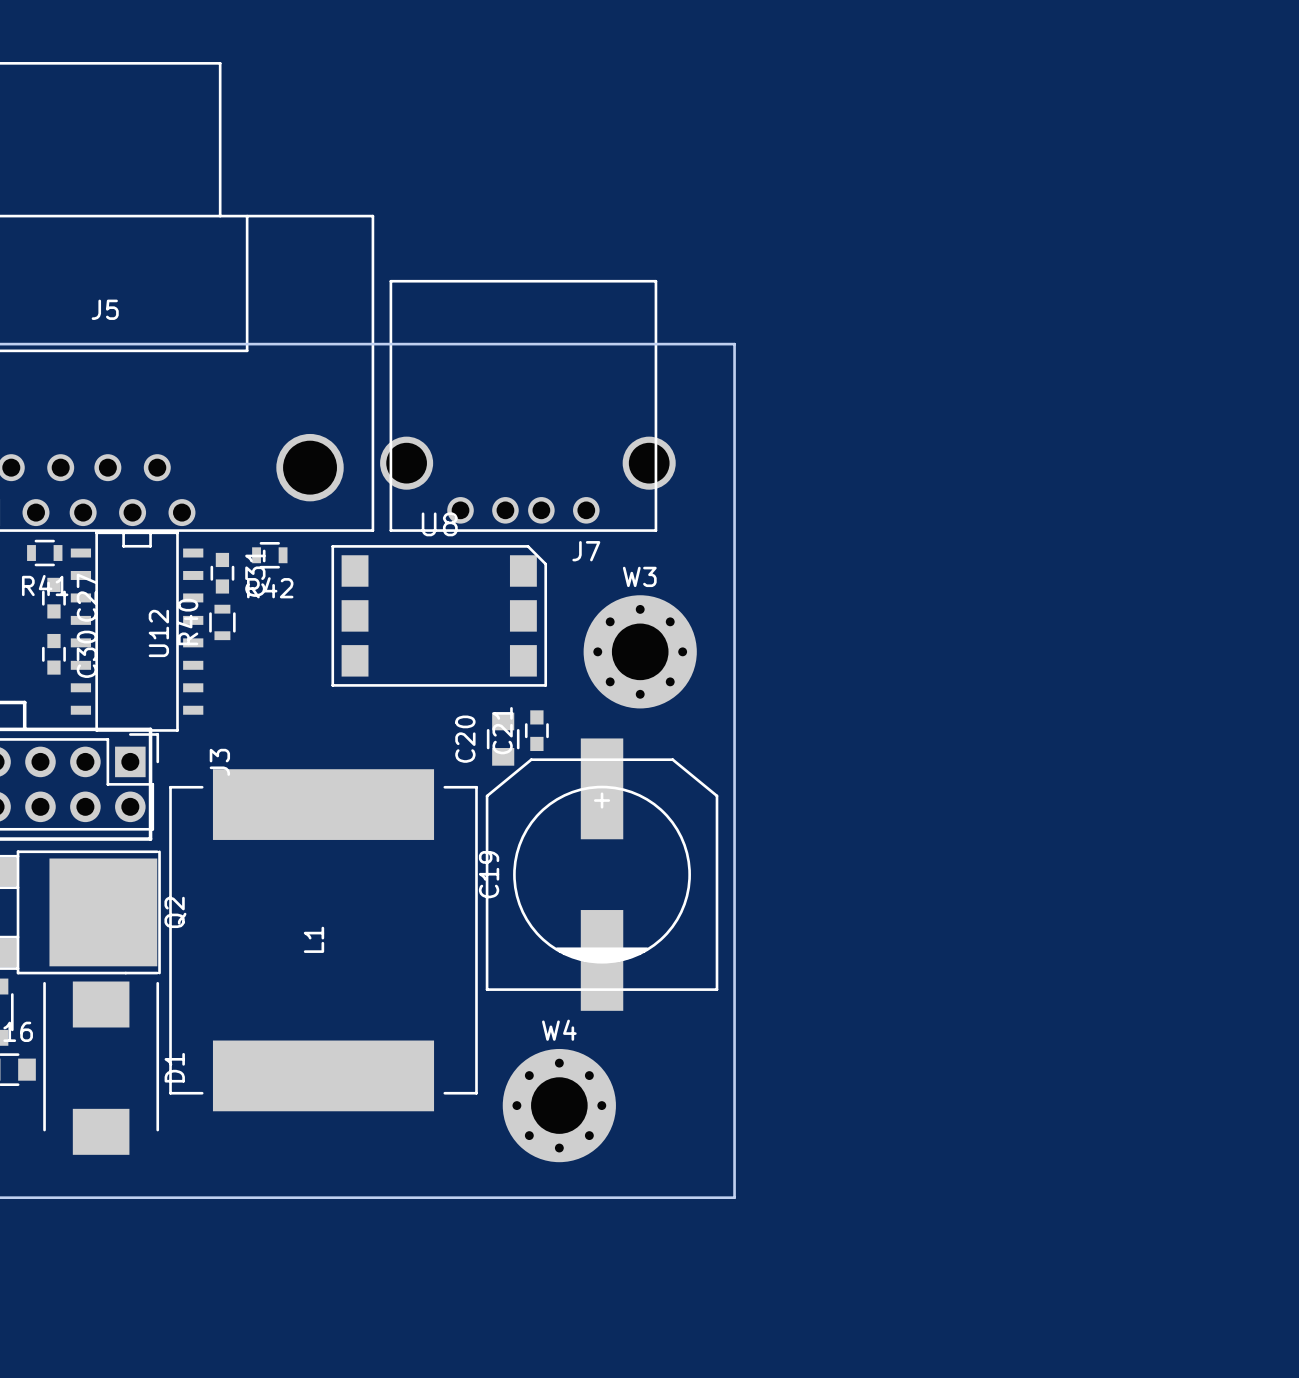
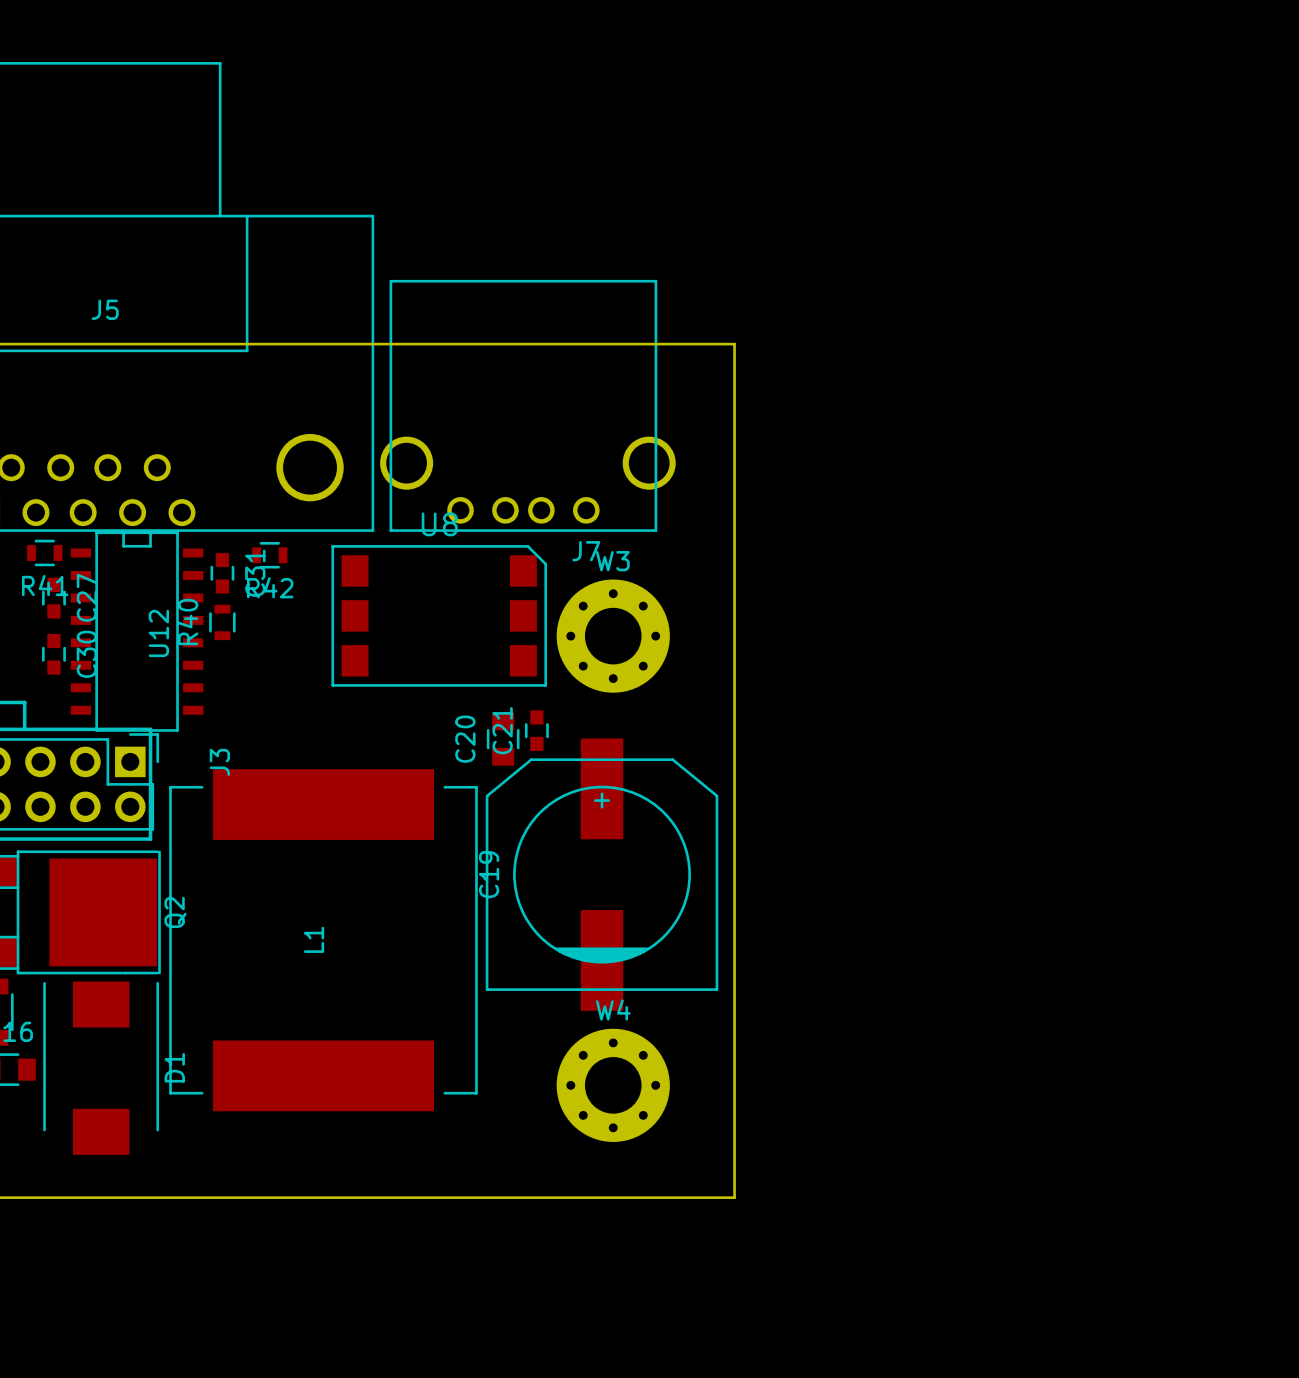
W3 position: (640, 651) -> (613, 636)
W4 position: (559, 1105) -> (613, 1085)

